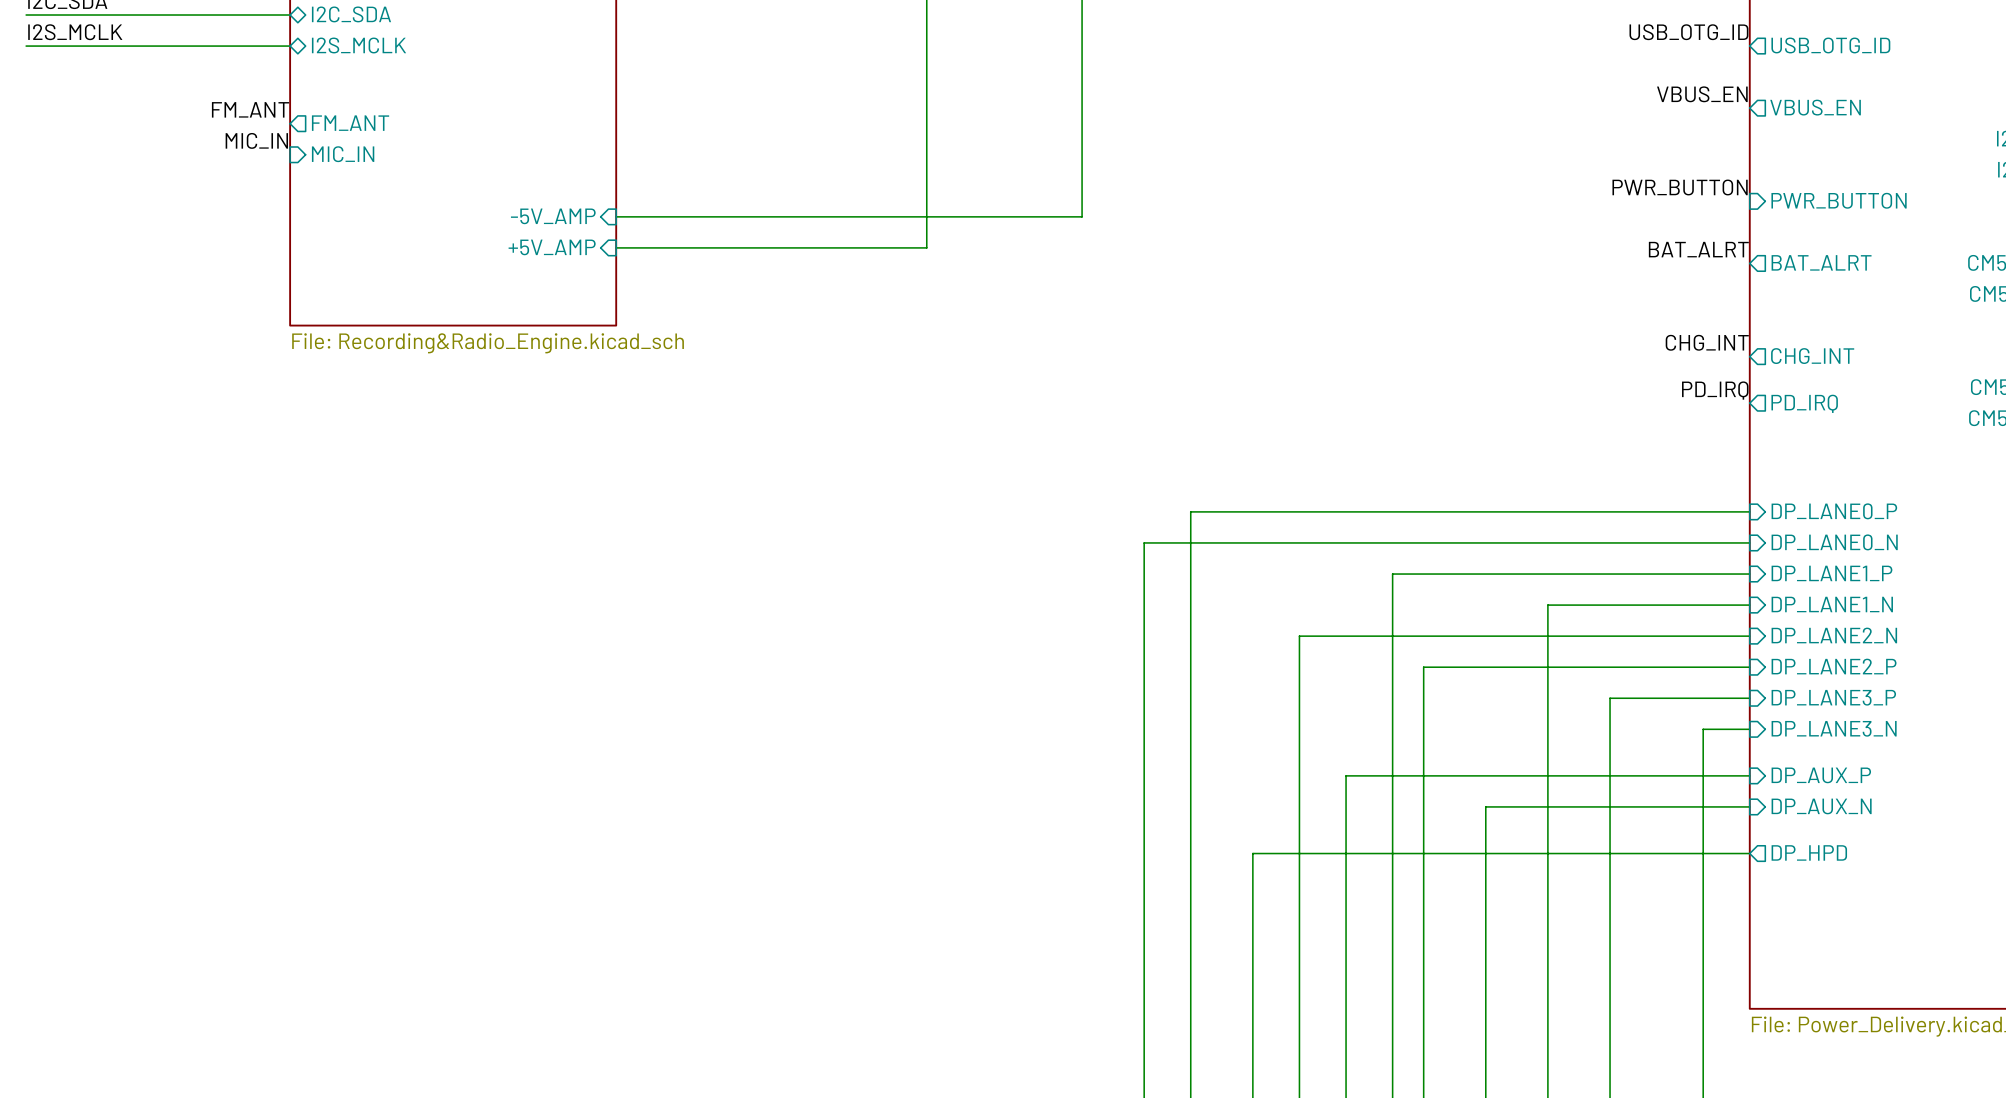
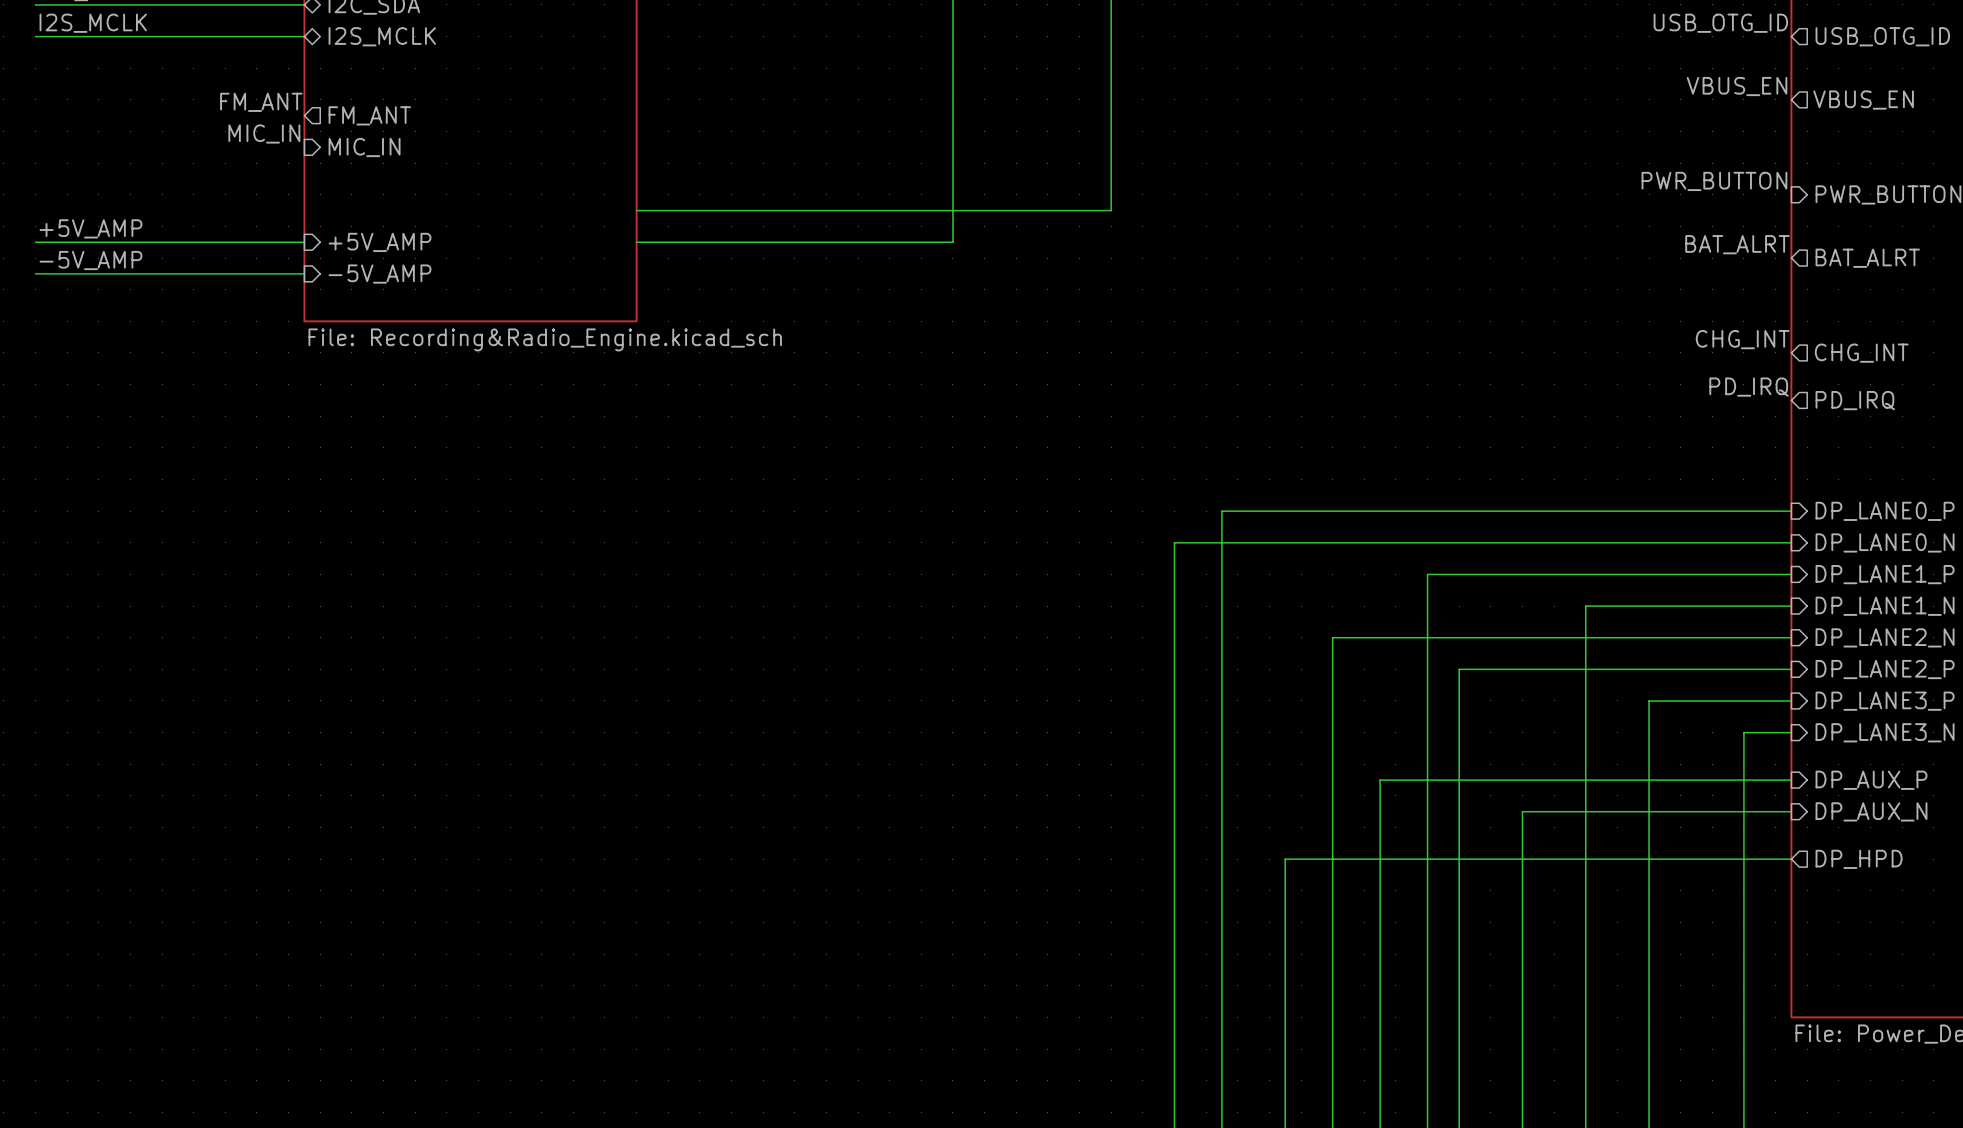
sheet pin rotation: 0° (553, 216) -> 180° (379, 274)
sheet pin position: -5V_AMP (553, 216) -> -5V_AMP (379, 274)
label: none -> +5V_AMP (90, 228)
wire: none -> (35, 242) (304, 242)
sheet pin rotation: 0° (552, 247) -> 180° (379, 242)
sheet pin position: +5V_AMP (552, 247) -> +5V_AMP (379, 242)
label: none -> -5V_AMP (90, 260)
wire: none -> (35, 273) (304, 273)

